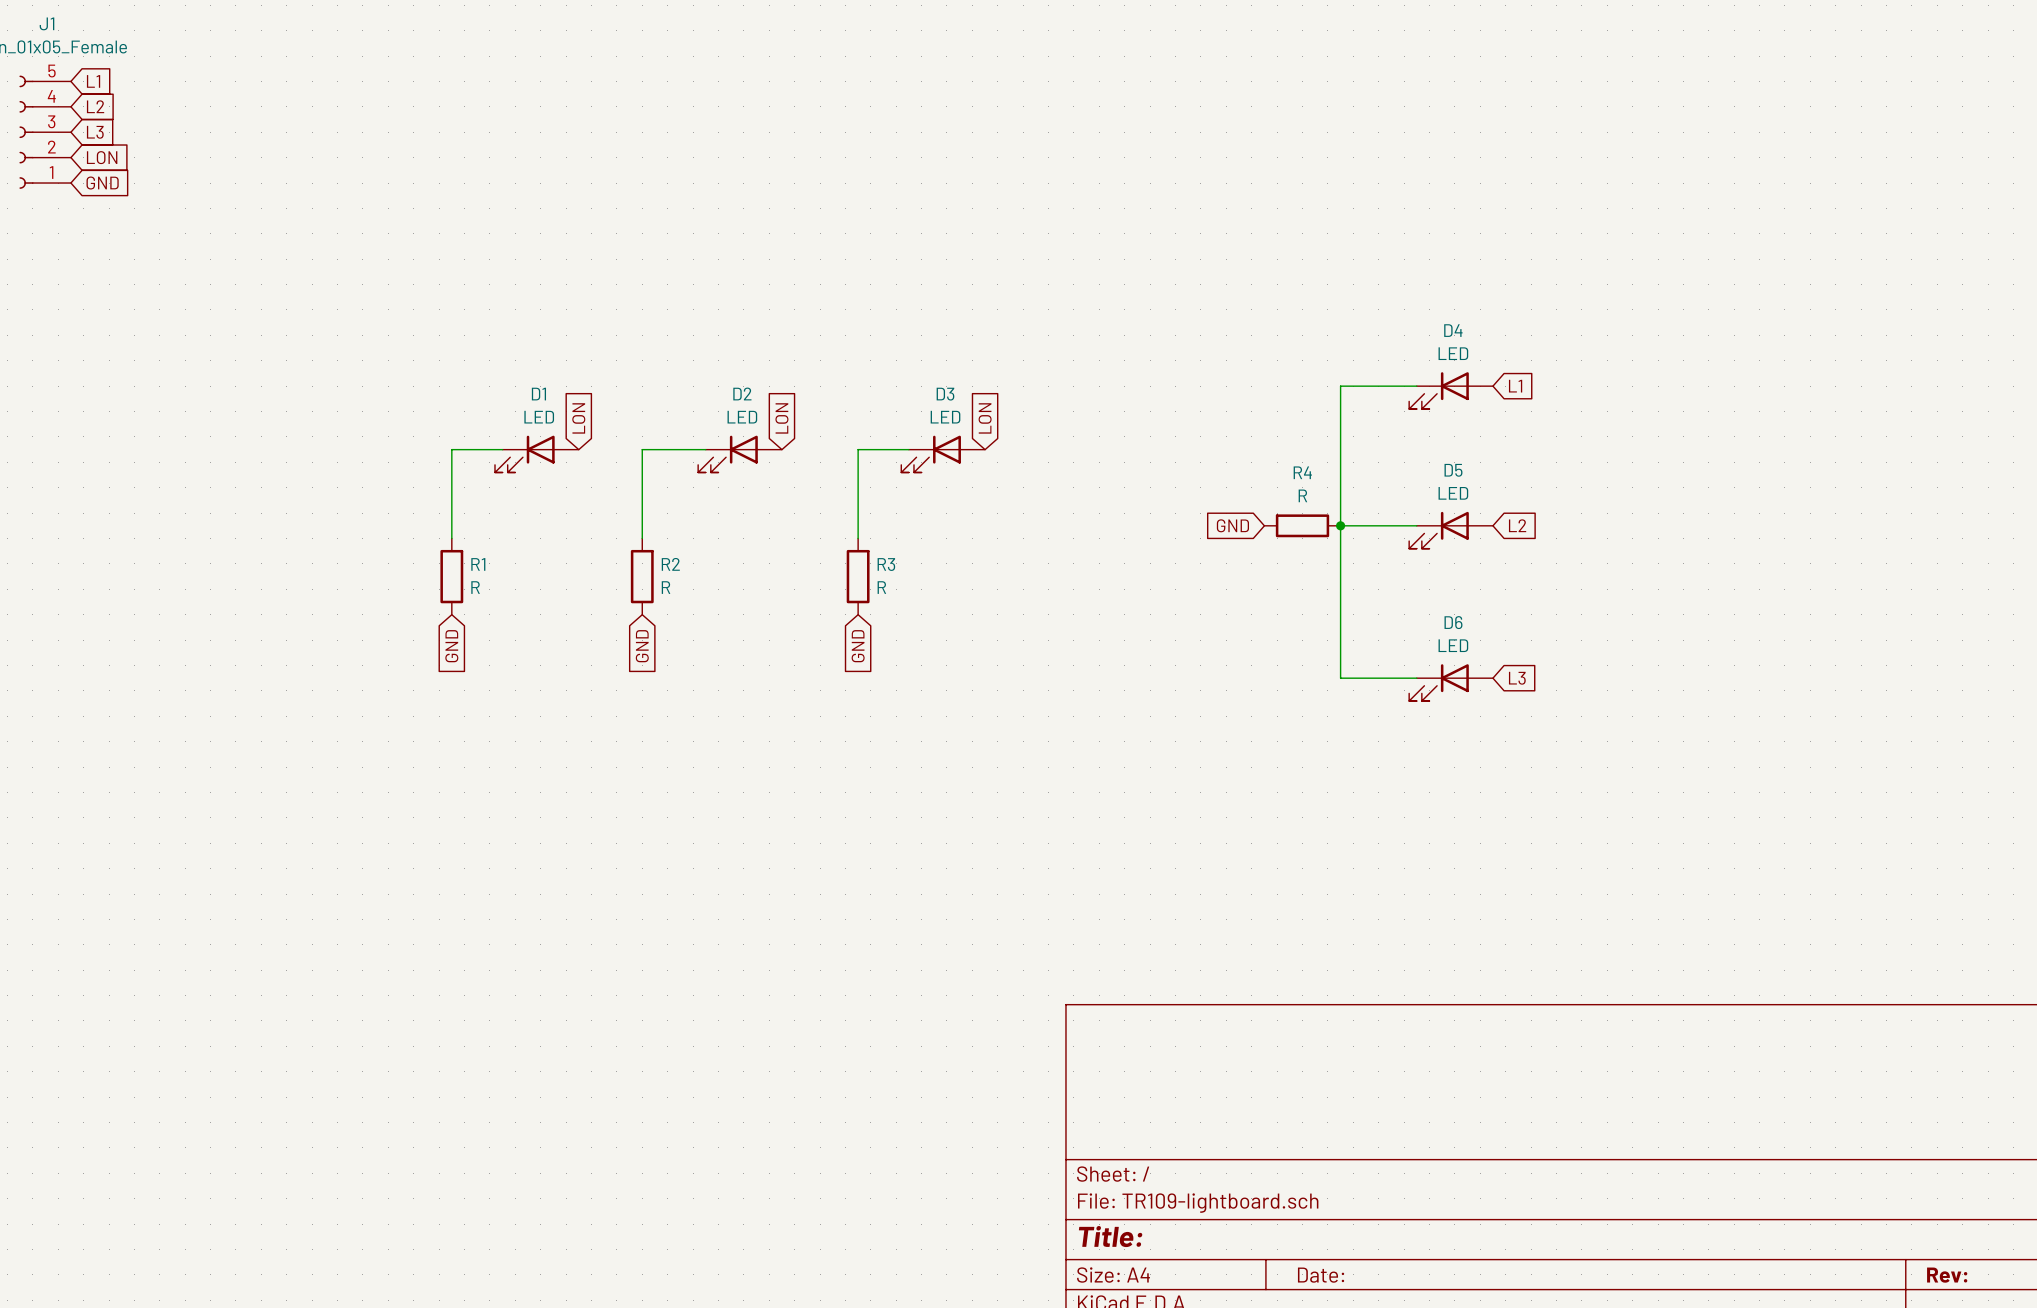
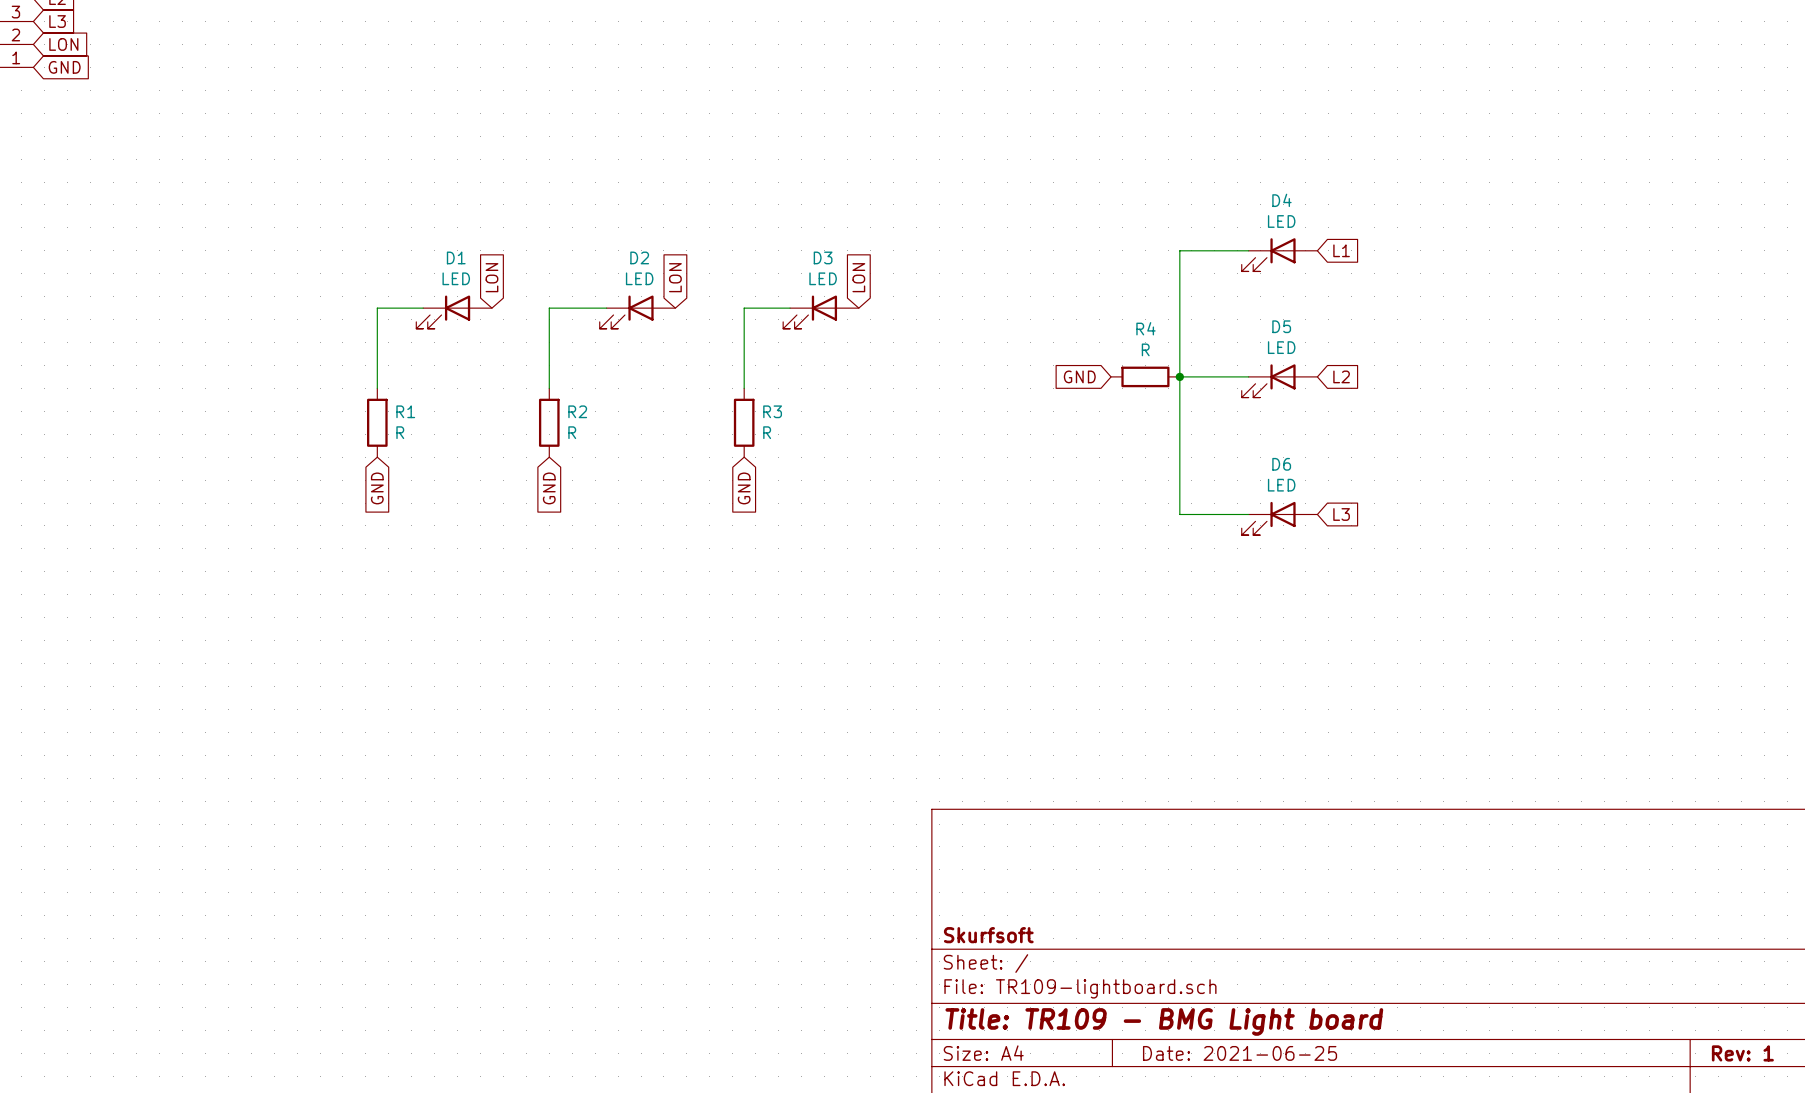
title block: none -> Skurfsoft (988, 935)
title block: Title: (1110, 1236) -> Title: TR109 - BMG Light board (1164, 1021)
title block: Date: (1321, 1275) -> Date: 2021-06-25 (1240, 1053)
title block: Rev: (1947, 1275) -> Rev: 1 (1742, 1053)

